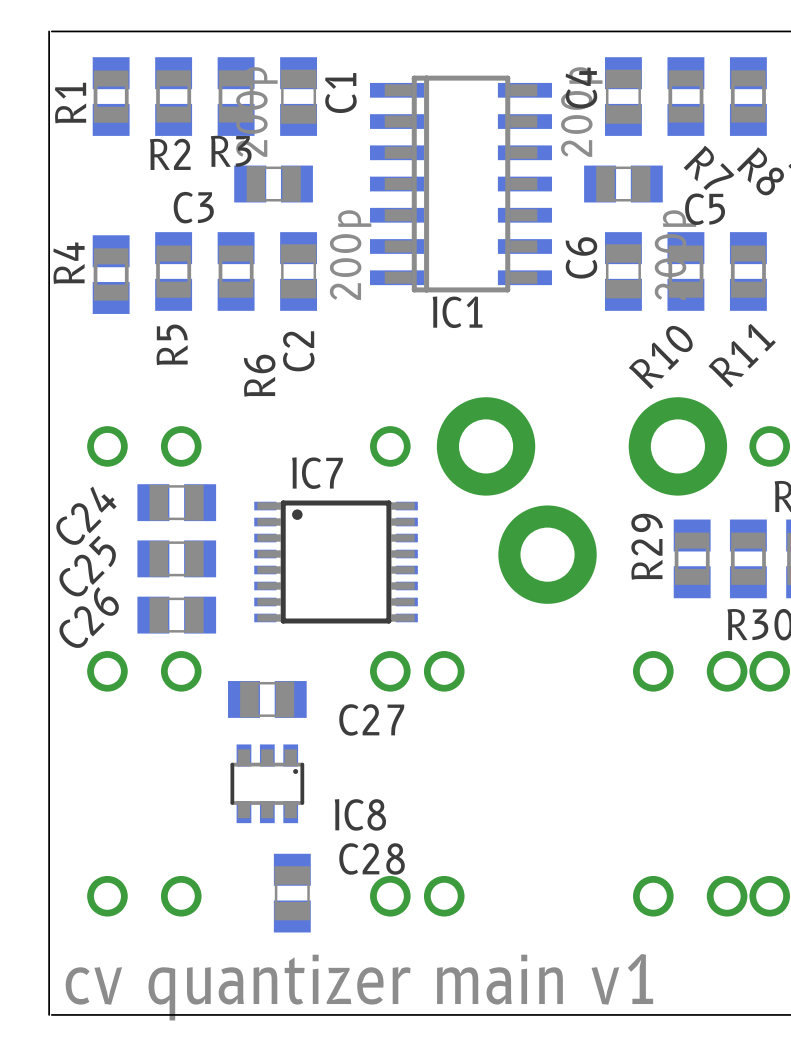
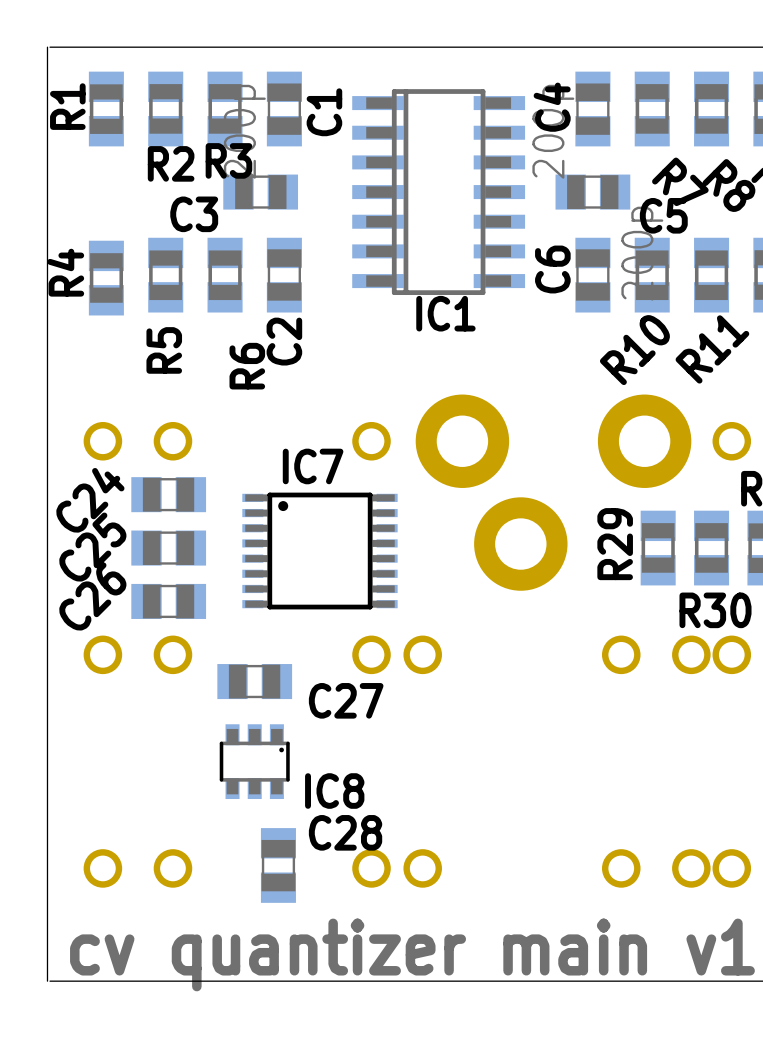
C2 value: 200p (350, 255) -> none

